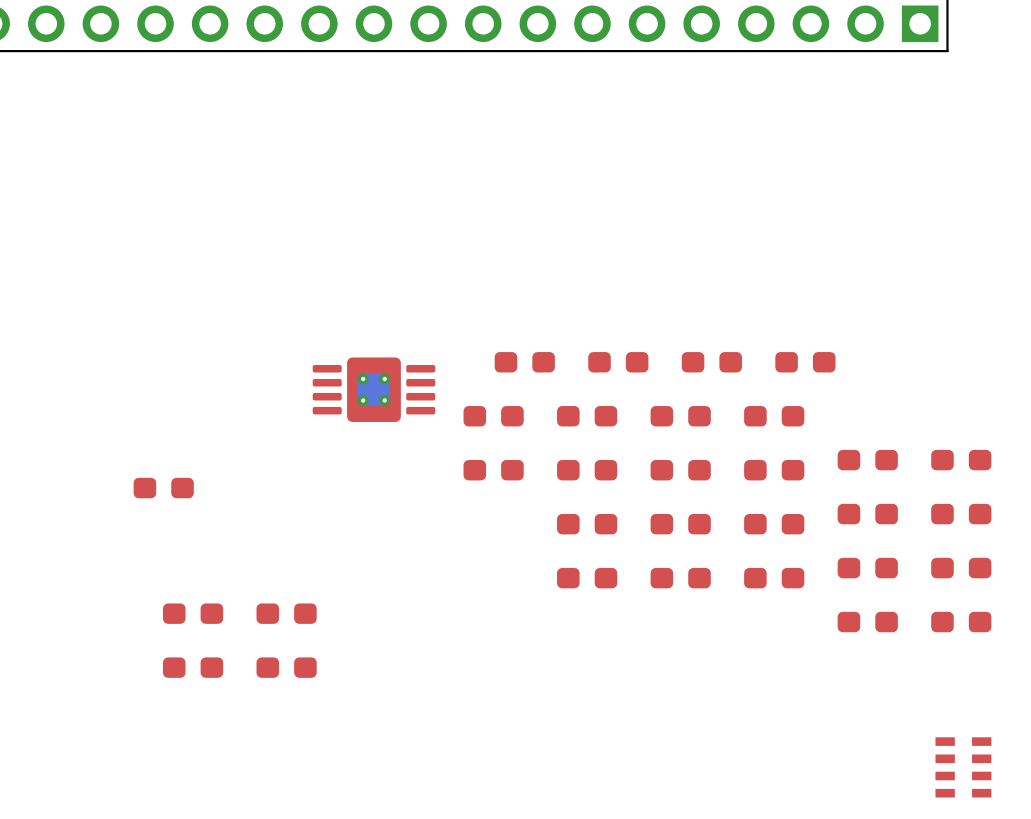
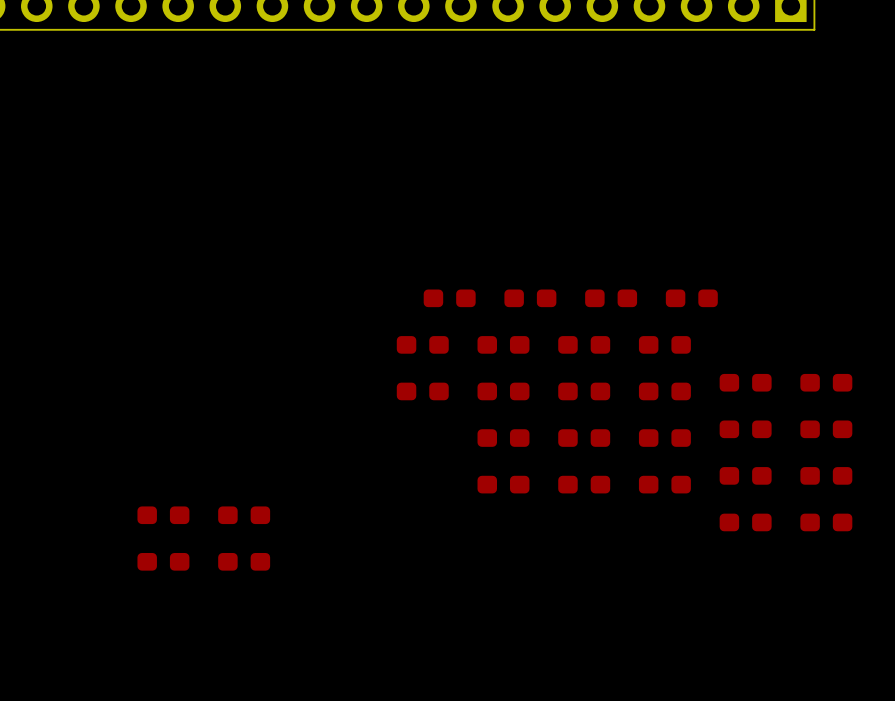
part: (373, 389) -> none
part: (163, 488) -> none
part: (963, 767) -> none

